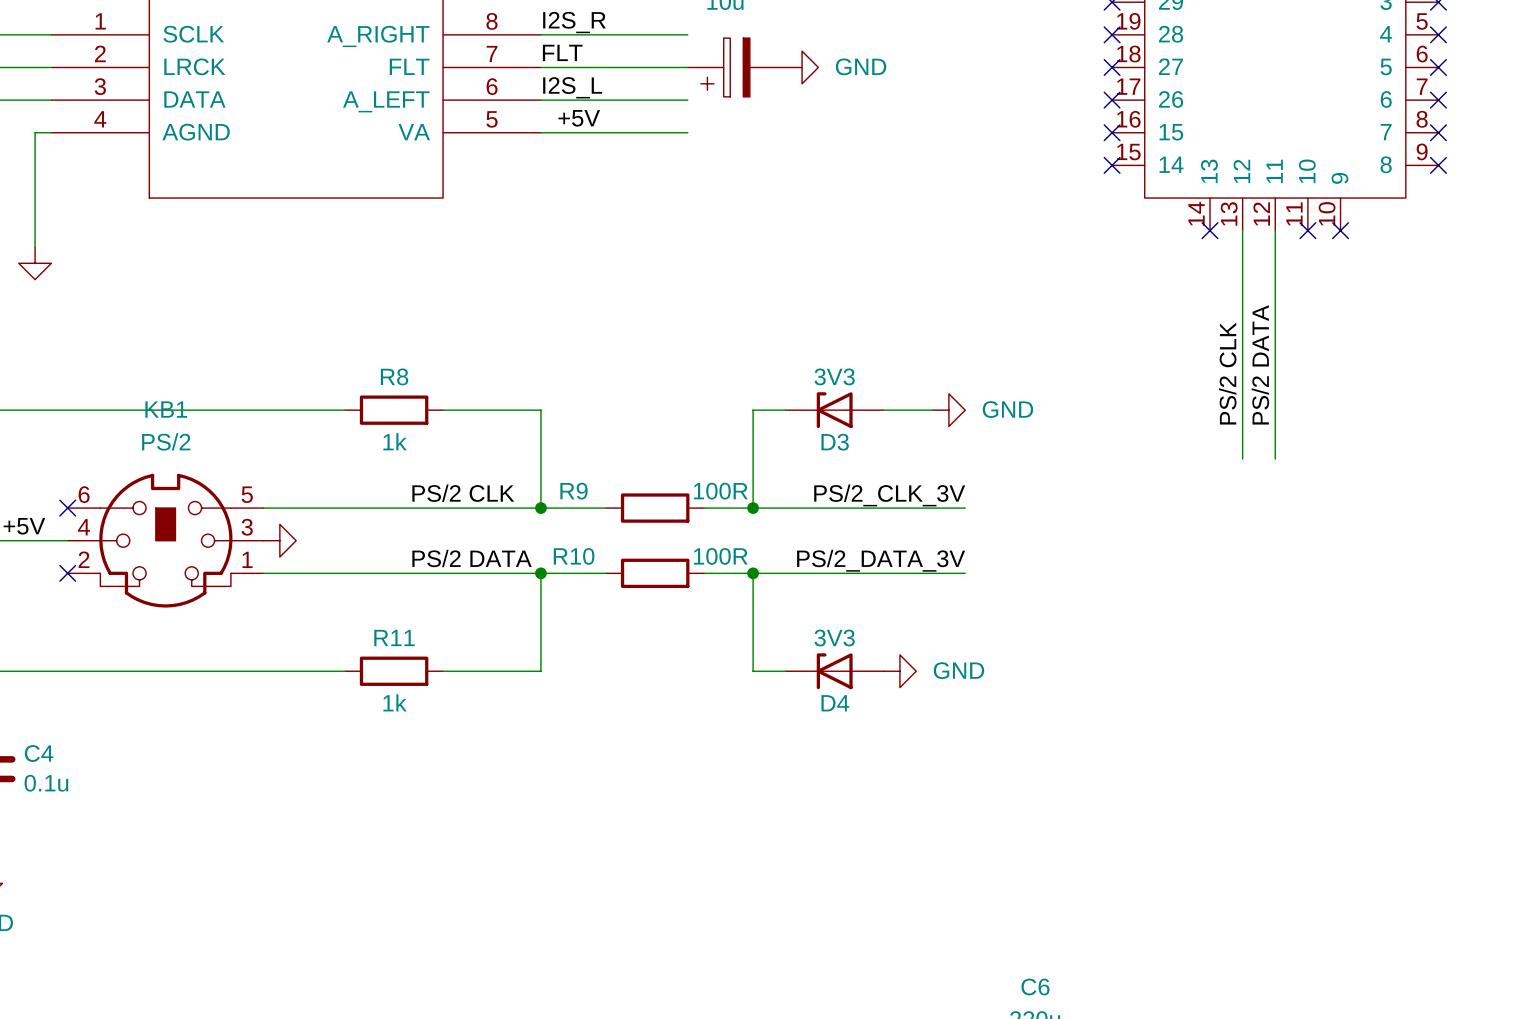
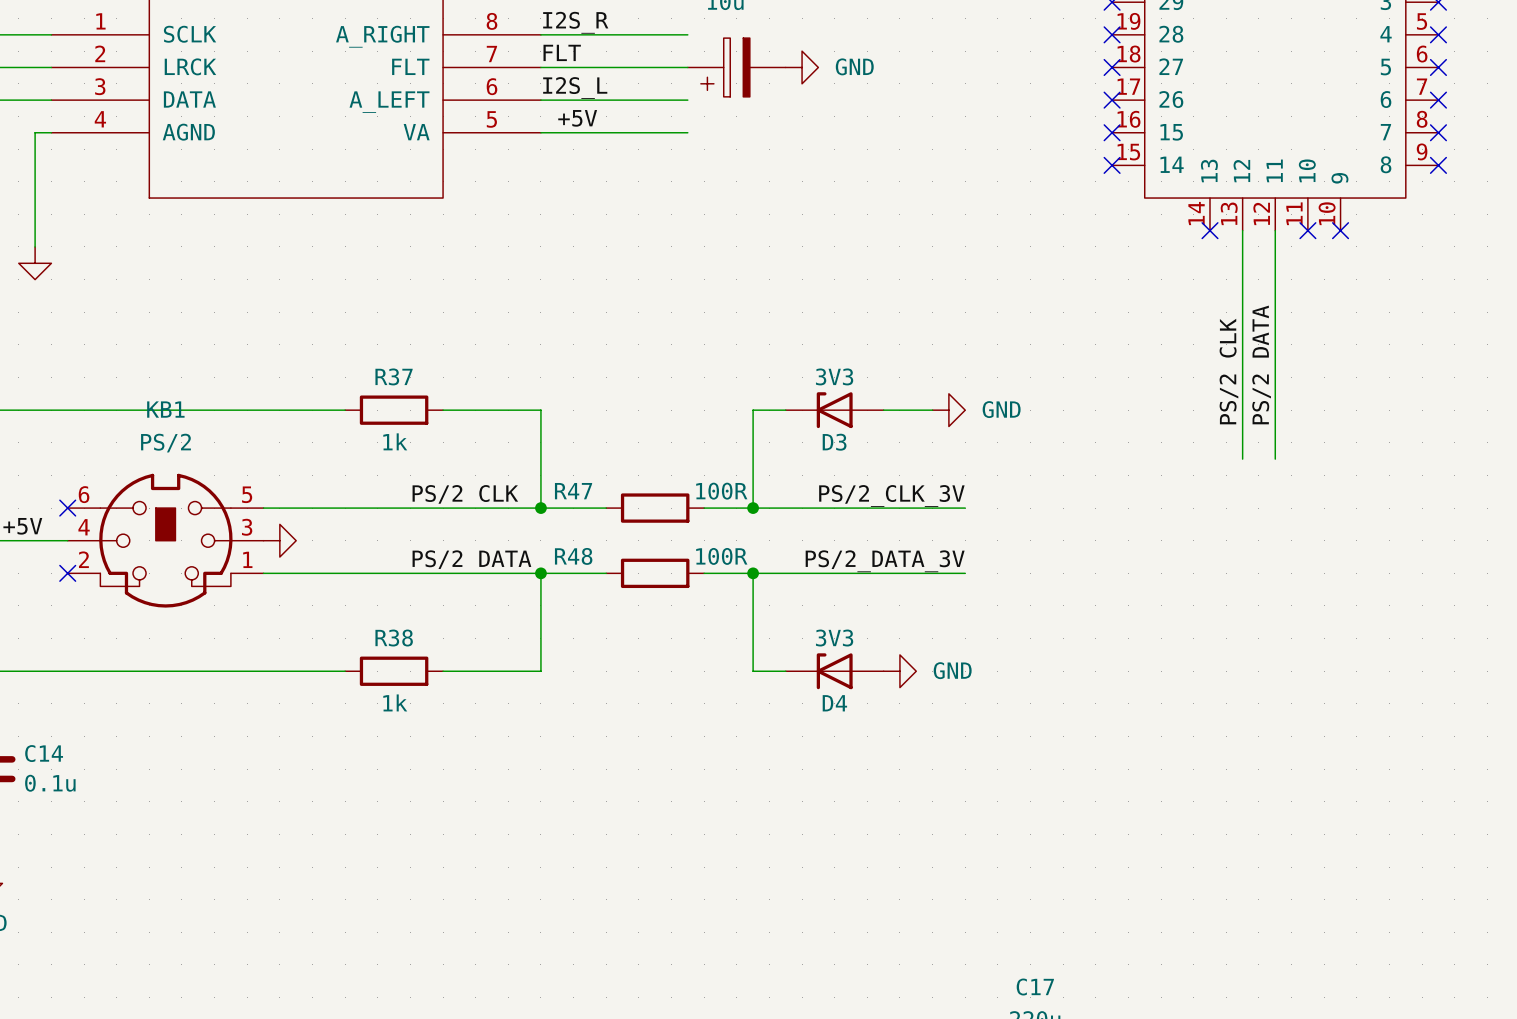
R8 name: R8 (394, 376) -> R37 (394, 376)
R9 name: R9 (574, 491) -> R47 (573, 491)
R10 name: R10 (574, 556) -> R48 (573, 556)
R11 name: R11 (394, 638) -> R38 (394, 638)
C4 name: C4 (39, 753) -> C14 (44, 753)
C6 name: C6 (1035, 986) -> C17 (1035, 987)

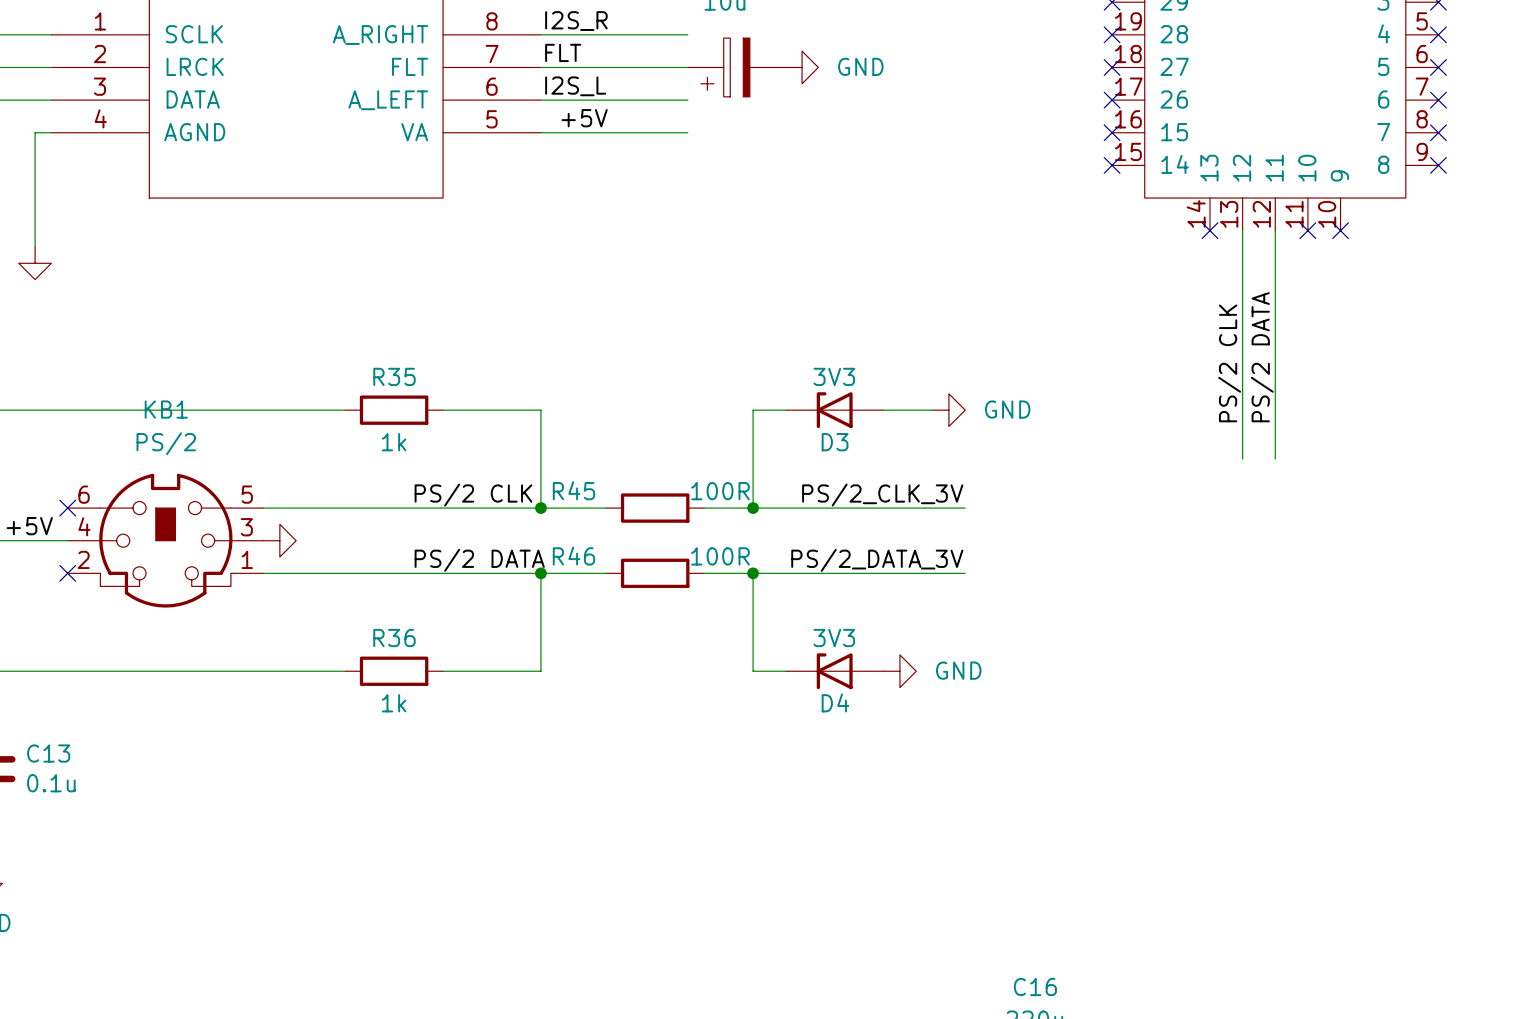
R37 name: R37 (394, 376) -> R35 (394, 376)
R47 name: R47 (573, 491) -> R45 (573, 490)
R48 name: R48 (573, 556) -> R46 (573, 556)
R38 name: R38 (394, 638) -> R36 (394, 638)
C14 name: C14 (44, 753) -> C13 (48, 753)
C17 name: C17 (1035, 987) -> C16 (1035, 987)

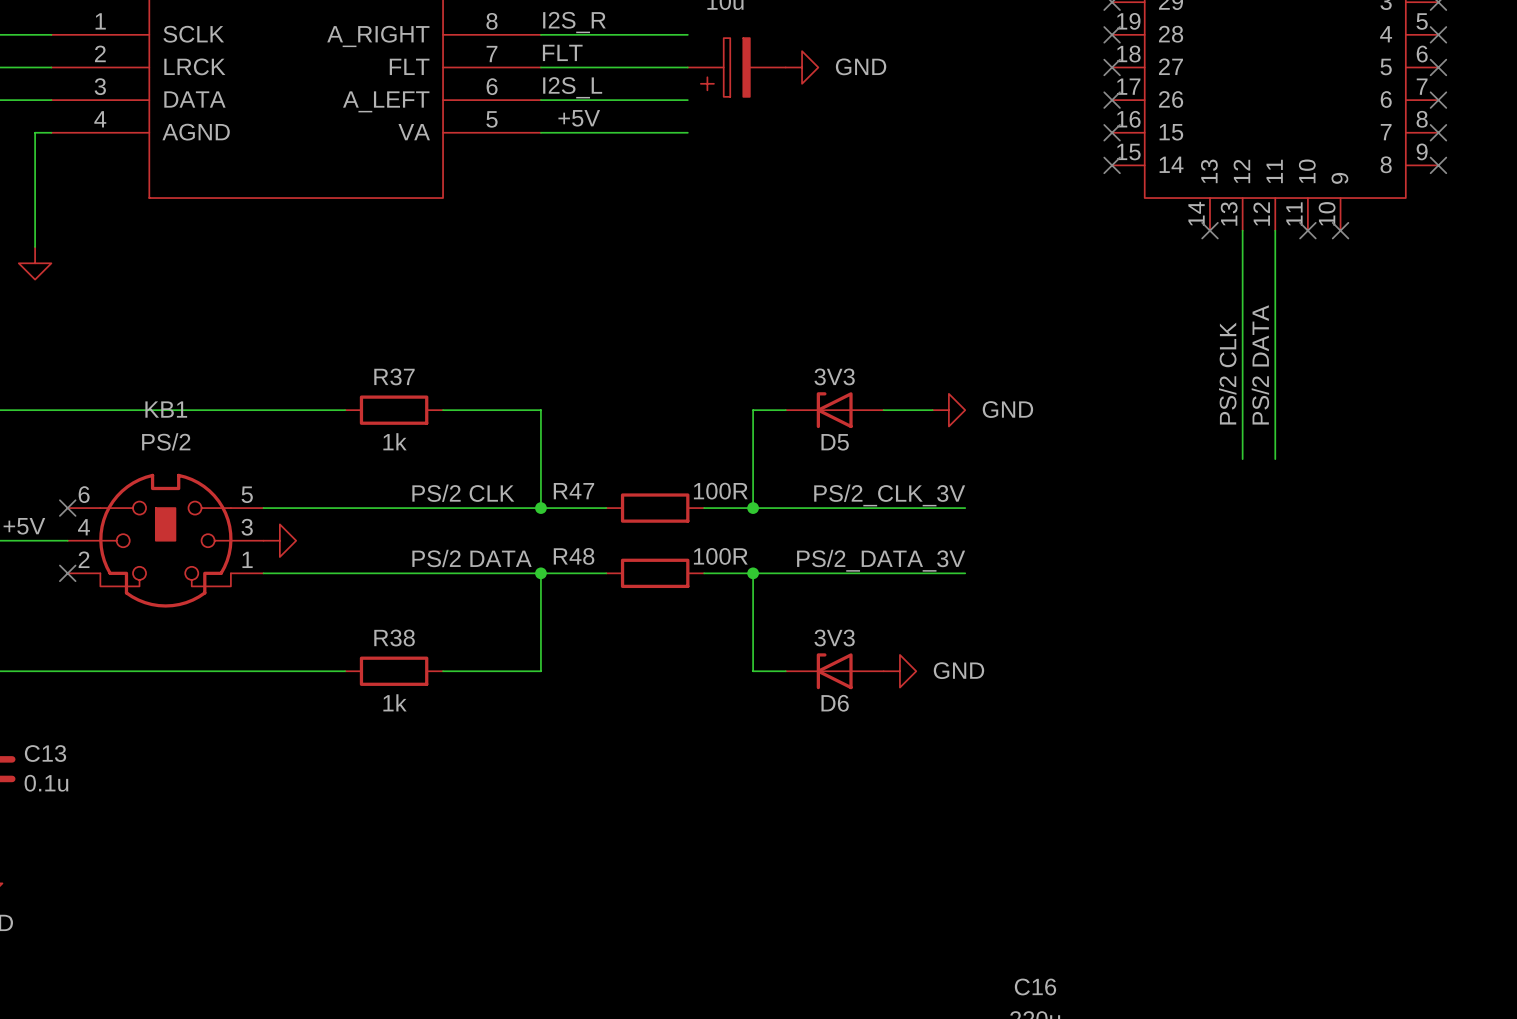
R35 name: R35 (394, 376) -> R37 (394, 376)
D3 name: D3 (835, 442) -> D5 (835, 442)
R45 name: R45 (573, 490) -> R47 (573, 491)
R46 name: R46 (573, 556) -> R48 (574, 556)
R36 name: R36 (394, 638) -> R38 (394, 638)
D4 name: D4 (835, 702) -> D6 (835, 703)

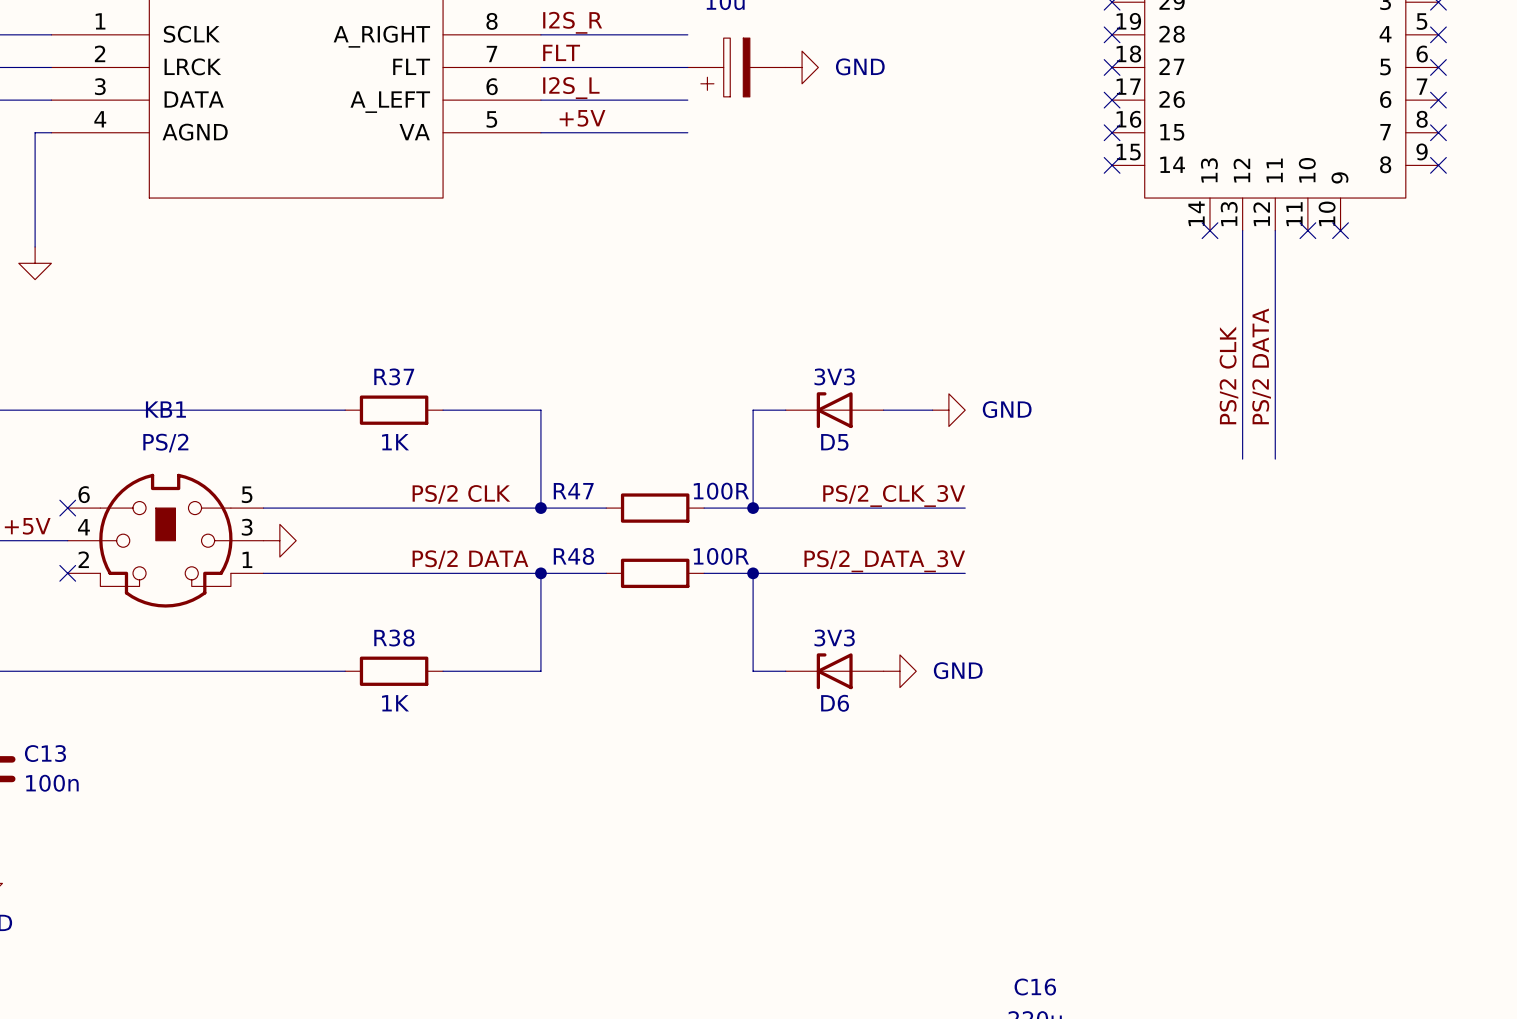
R37 value: 1k (395, 441) -> 1K (395, 442)
R38 value: 1k (395, 702) -> 1K (395, 703)
C13 value: 0.1u (46, 783) -> 100n (52, 783)

